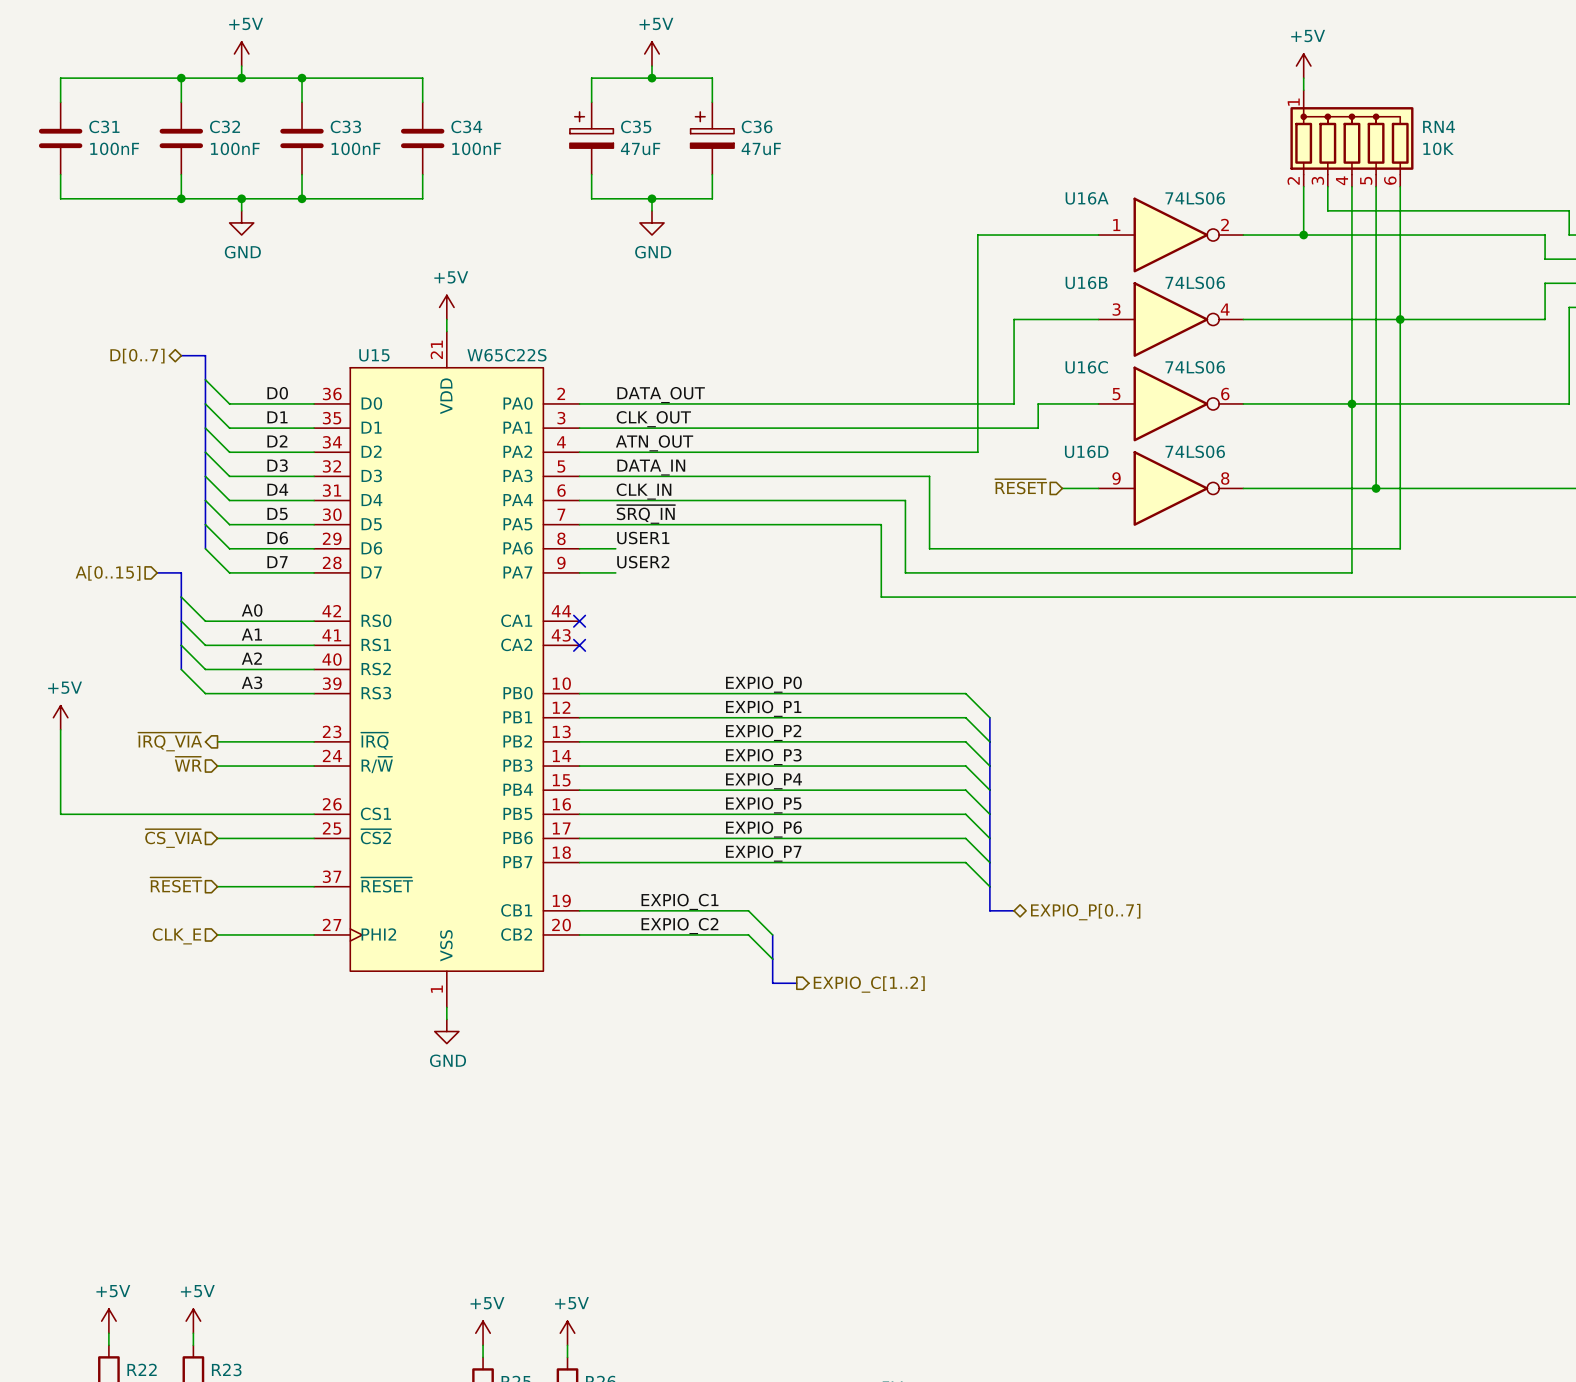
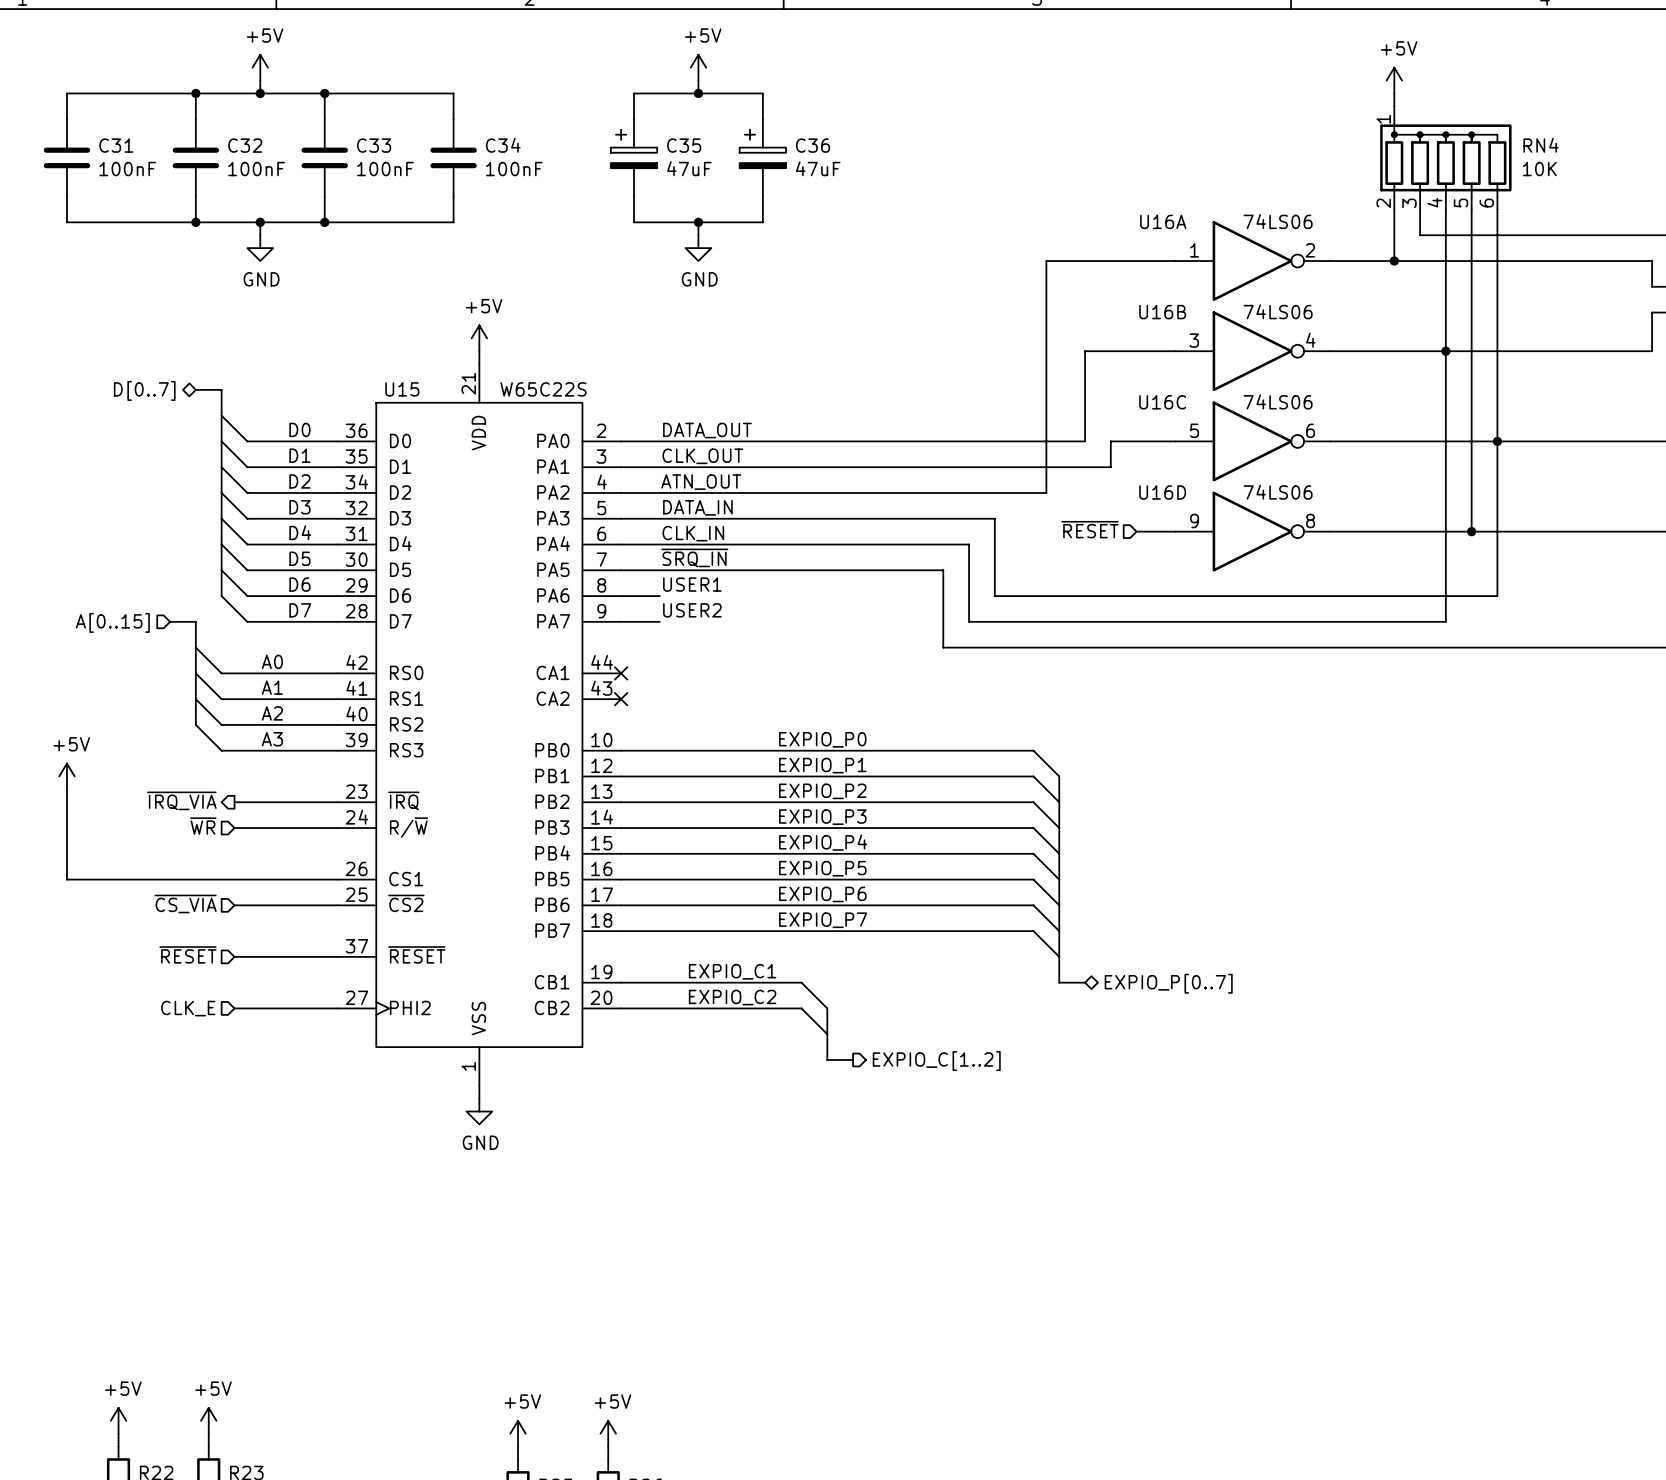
junction: none -> (1445, 351)
junction: (1400, 319) -> none
junction: (1351, 403) -> none
junction: none -> (1497, 441)

